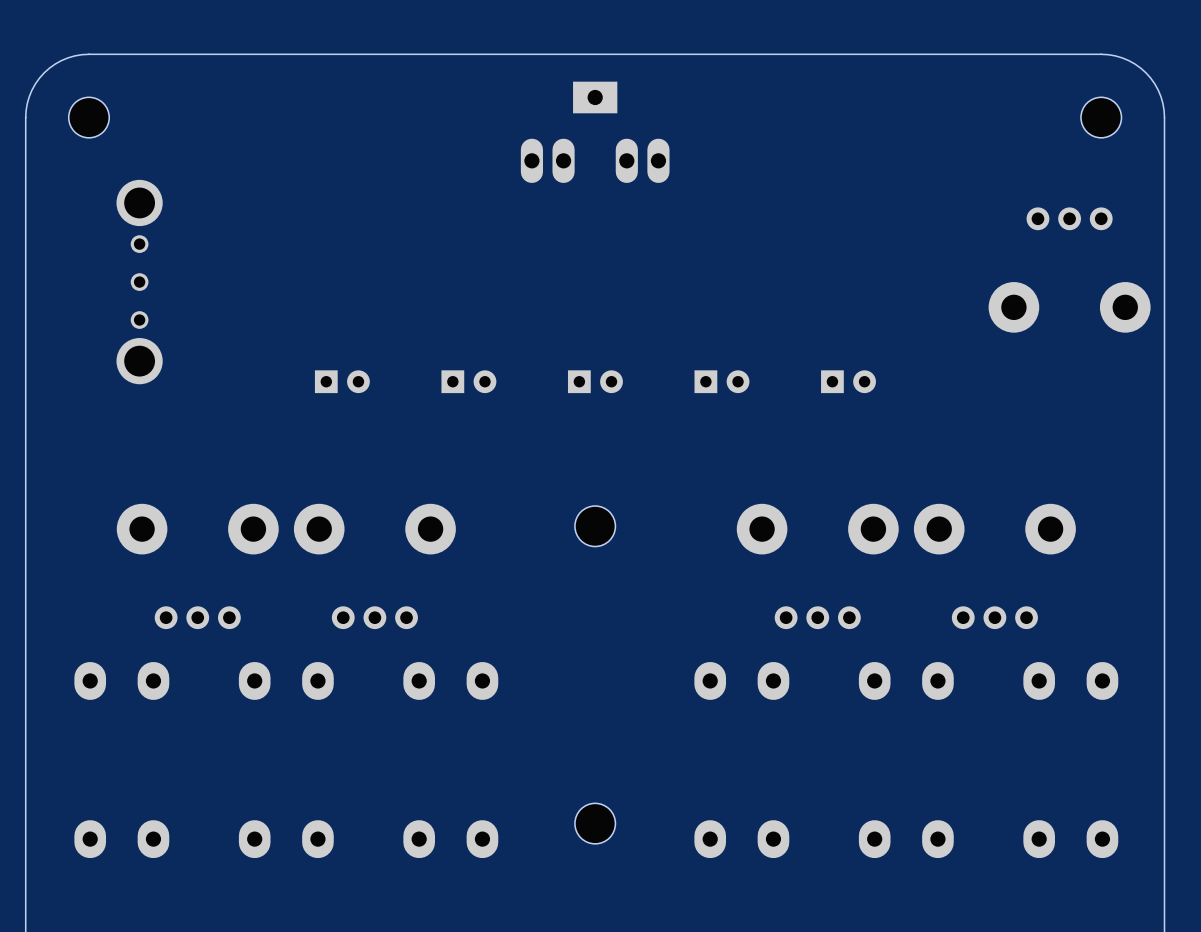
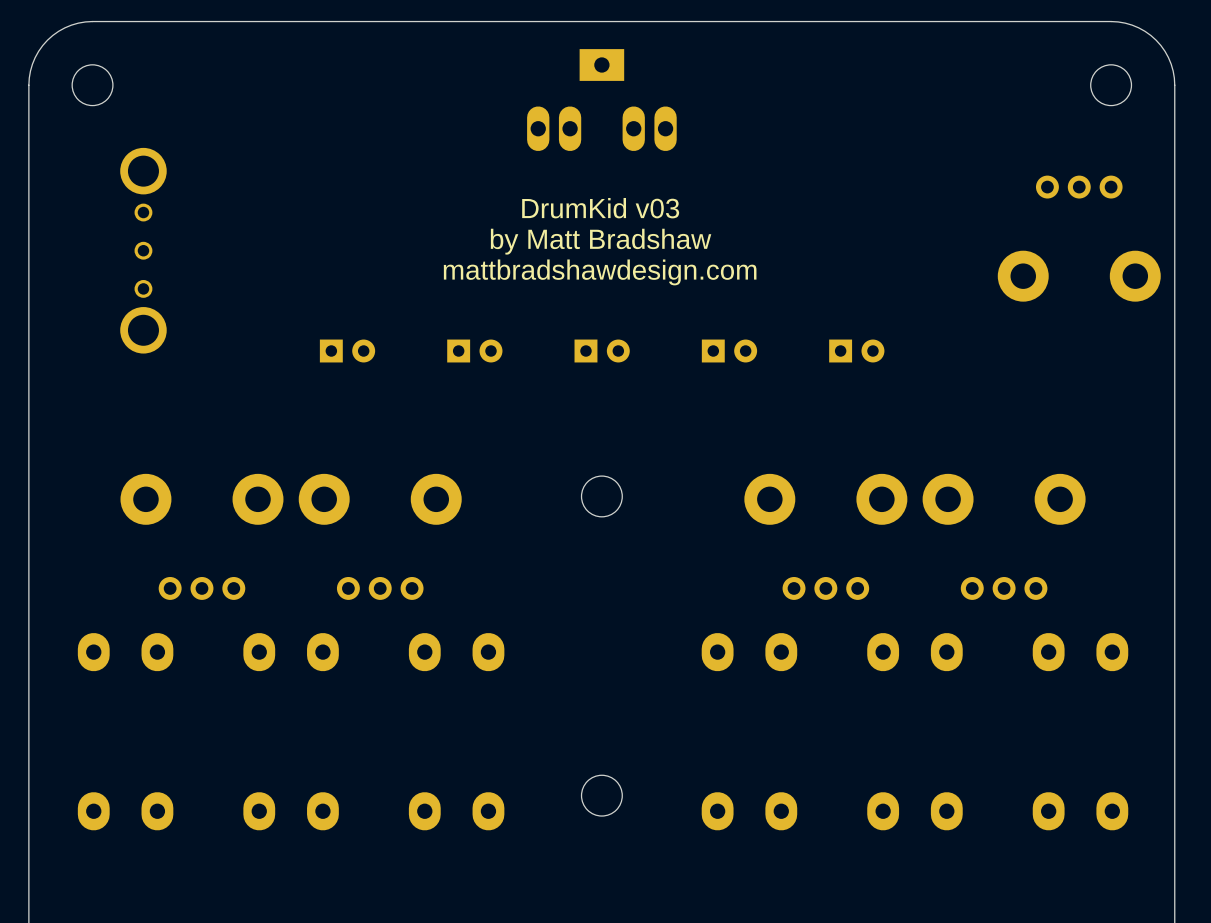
text: none -> DrumKid v03 (600, 208)
text: none -> by Matt Bradshaw (601, 241)
text: none -> mattbradshawdesign.com (600, 272)

